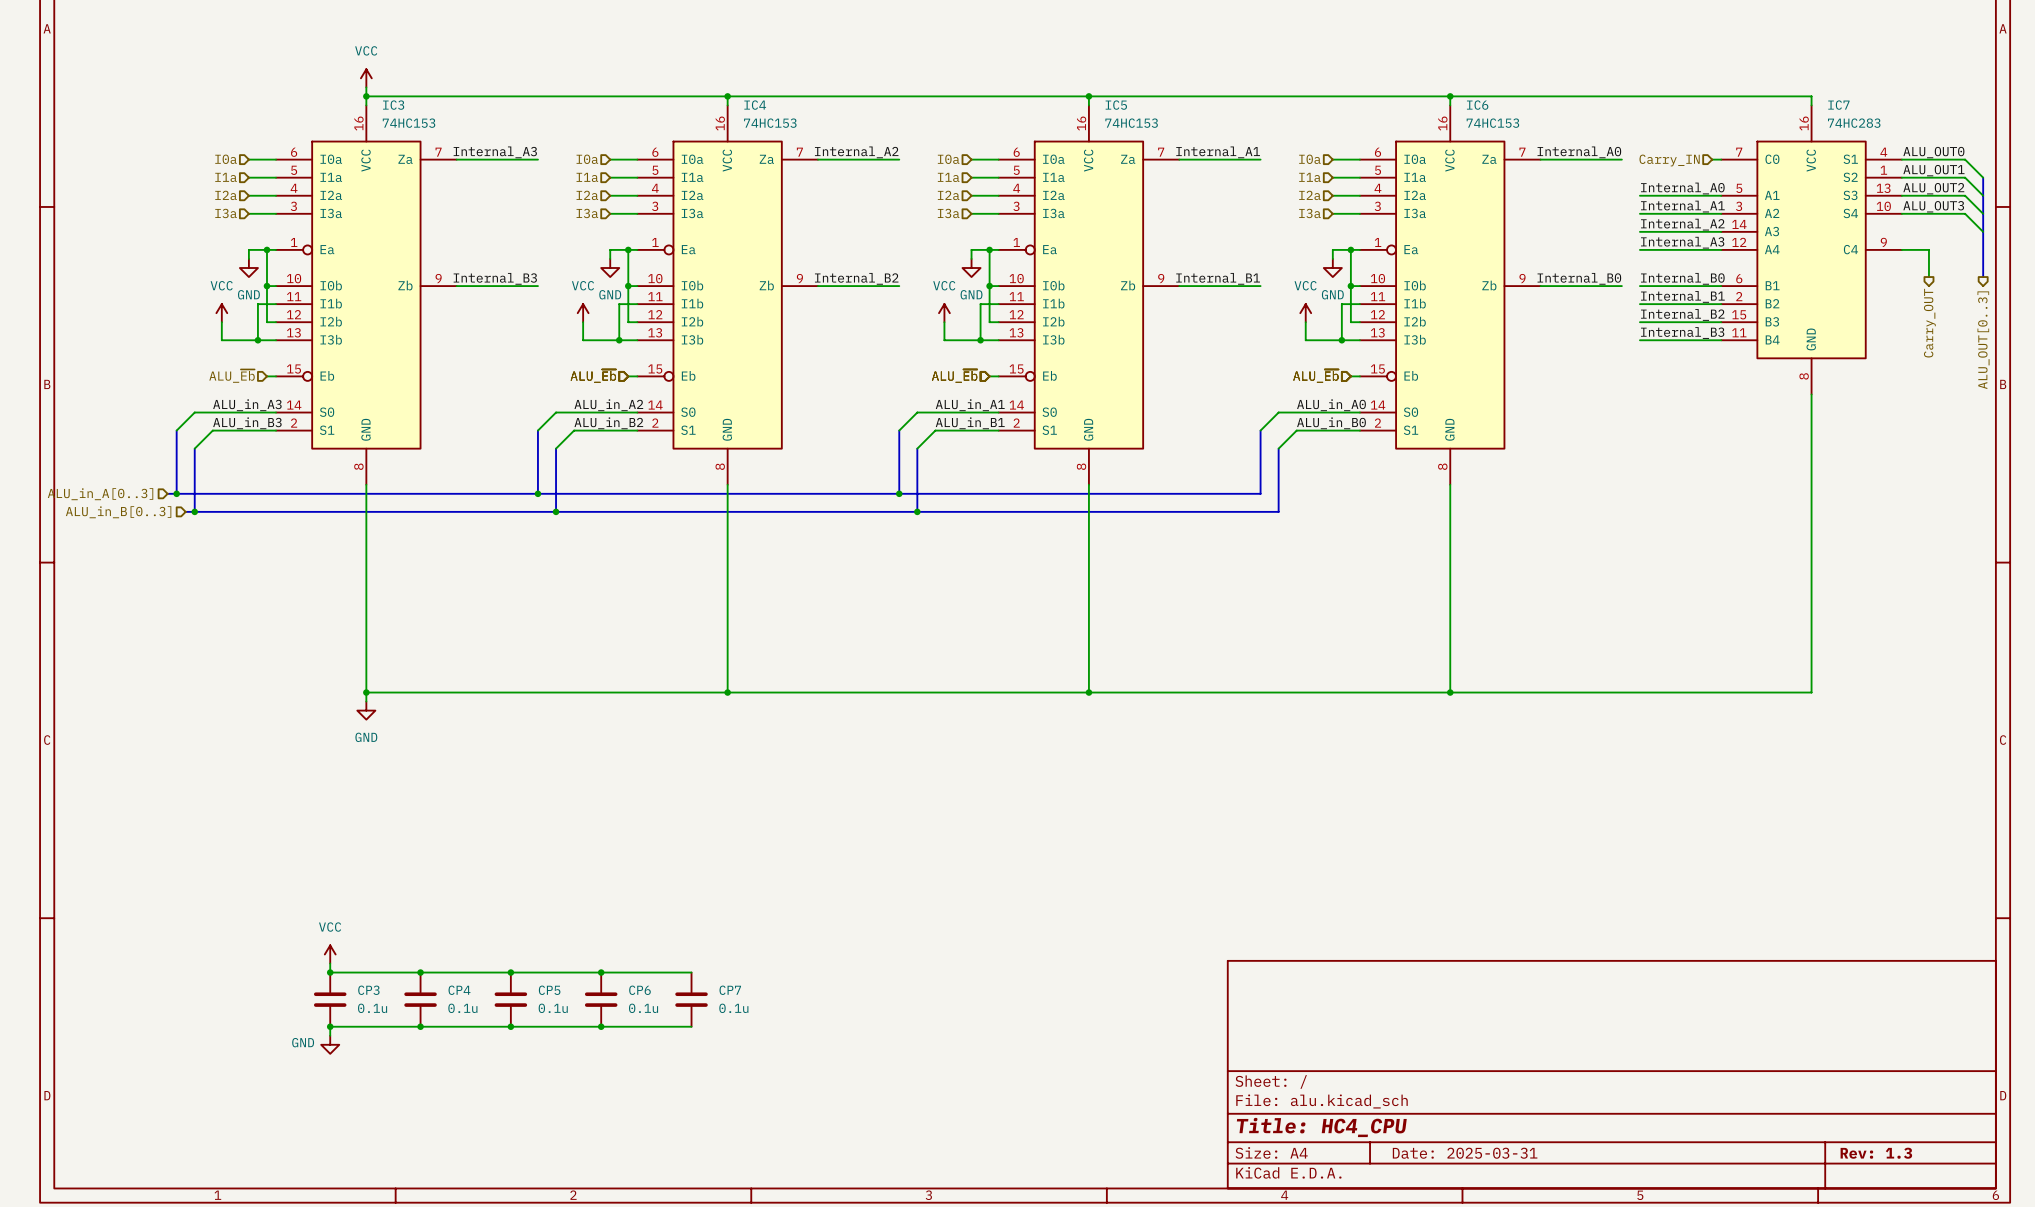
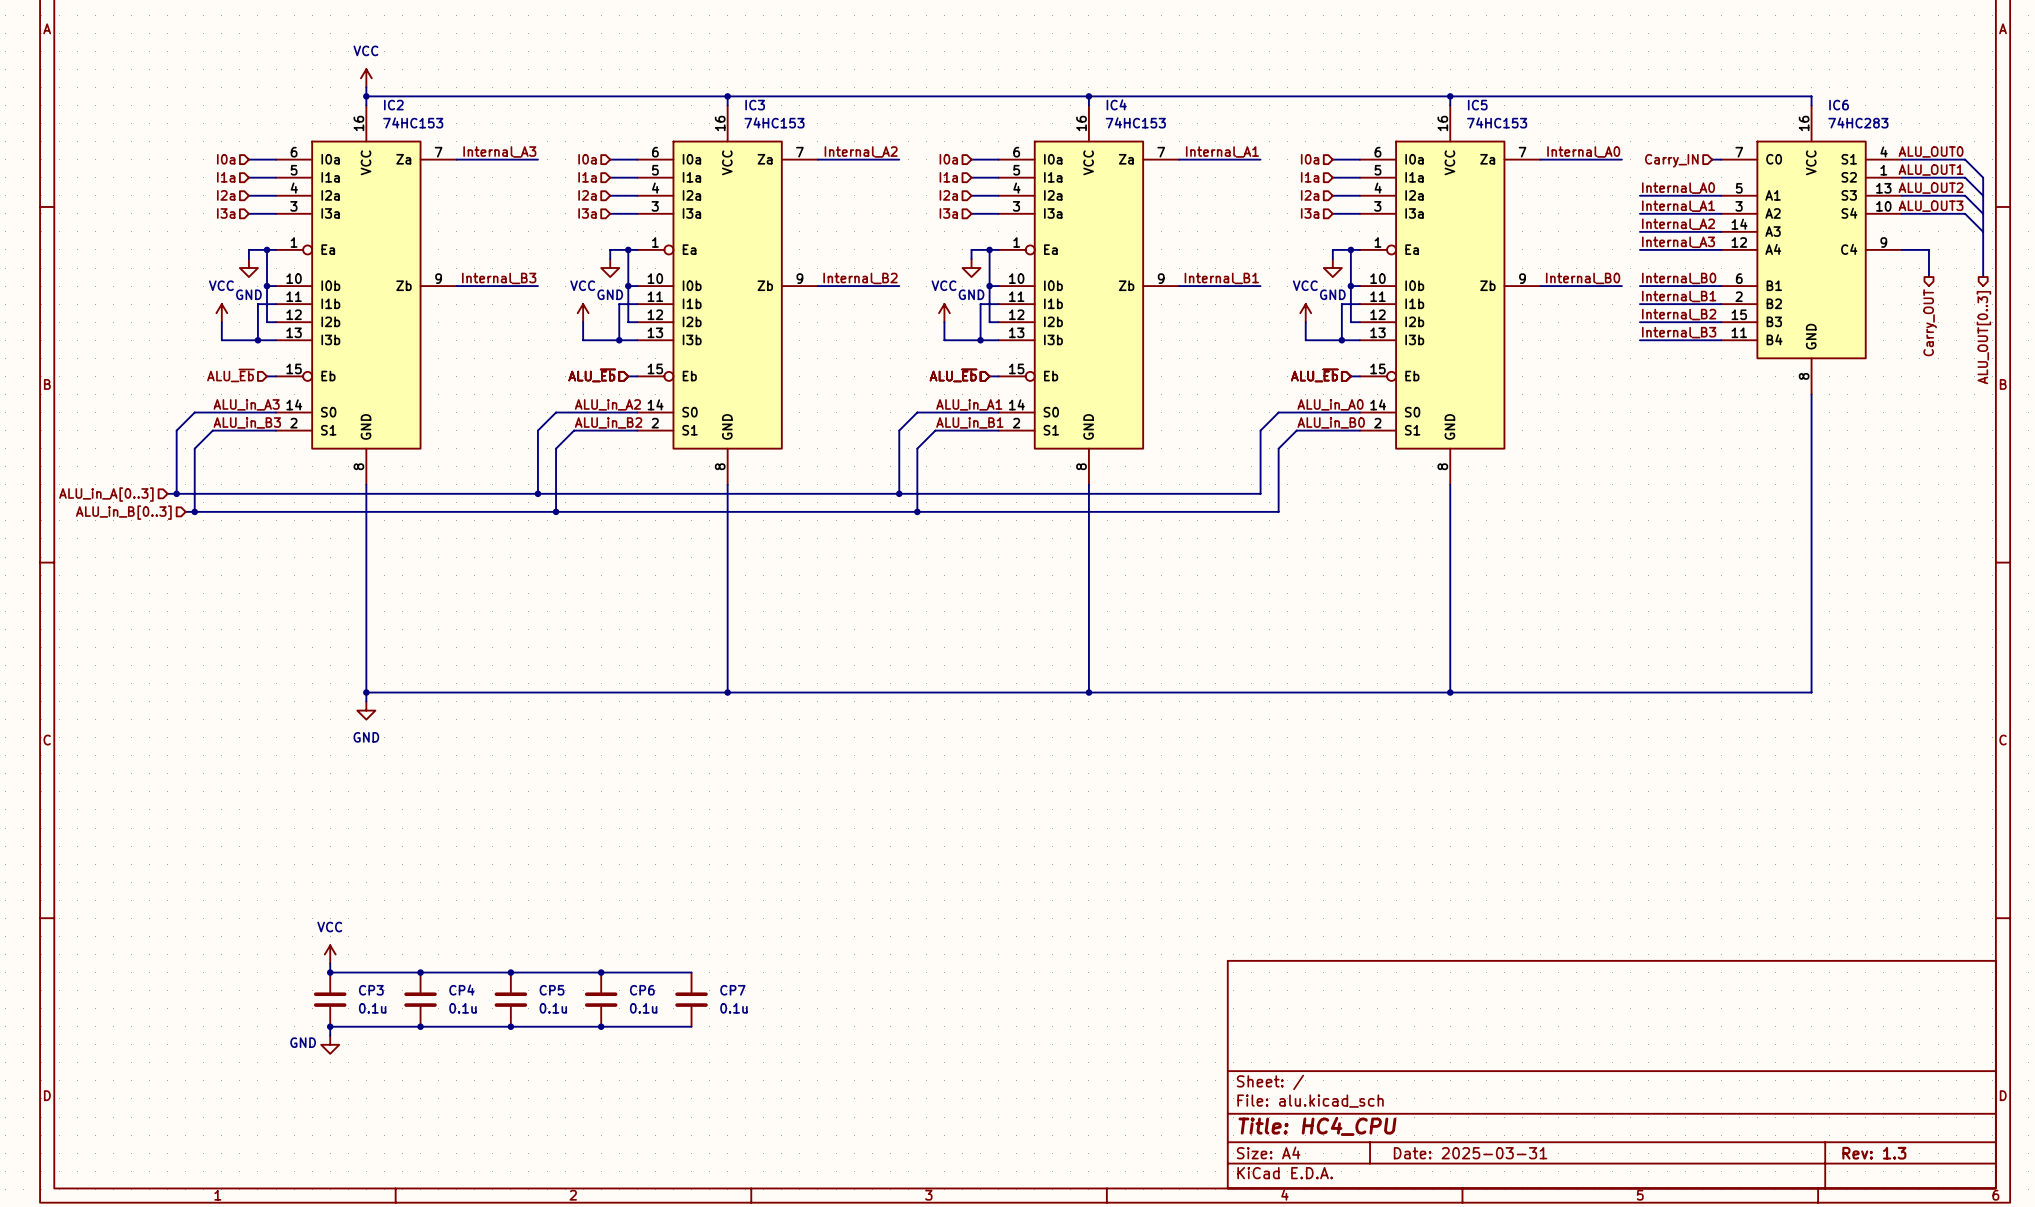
IC3 name: IC3 (393, 105) -> IC2 (393, 105)
IC4 name: IC4 (755, 105) -> IC3 (755, 105)
IC5 name: IC5 (1116, 105) -> IC4 (1116, 104)
IC6 name: IC6 (1477, 105) -> IC5 (1477, 105)
IC7 name: IC7 (1838, 105) -> IC6 (1839, 105)

